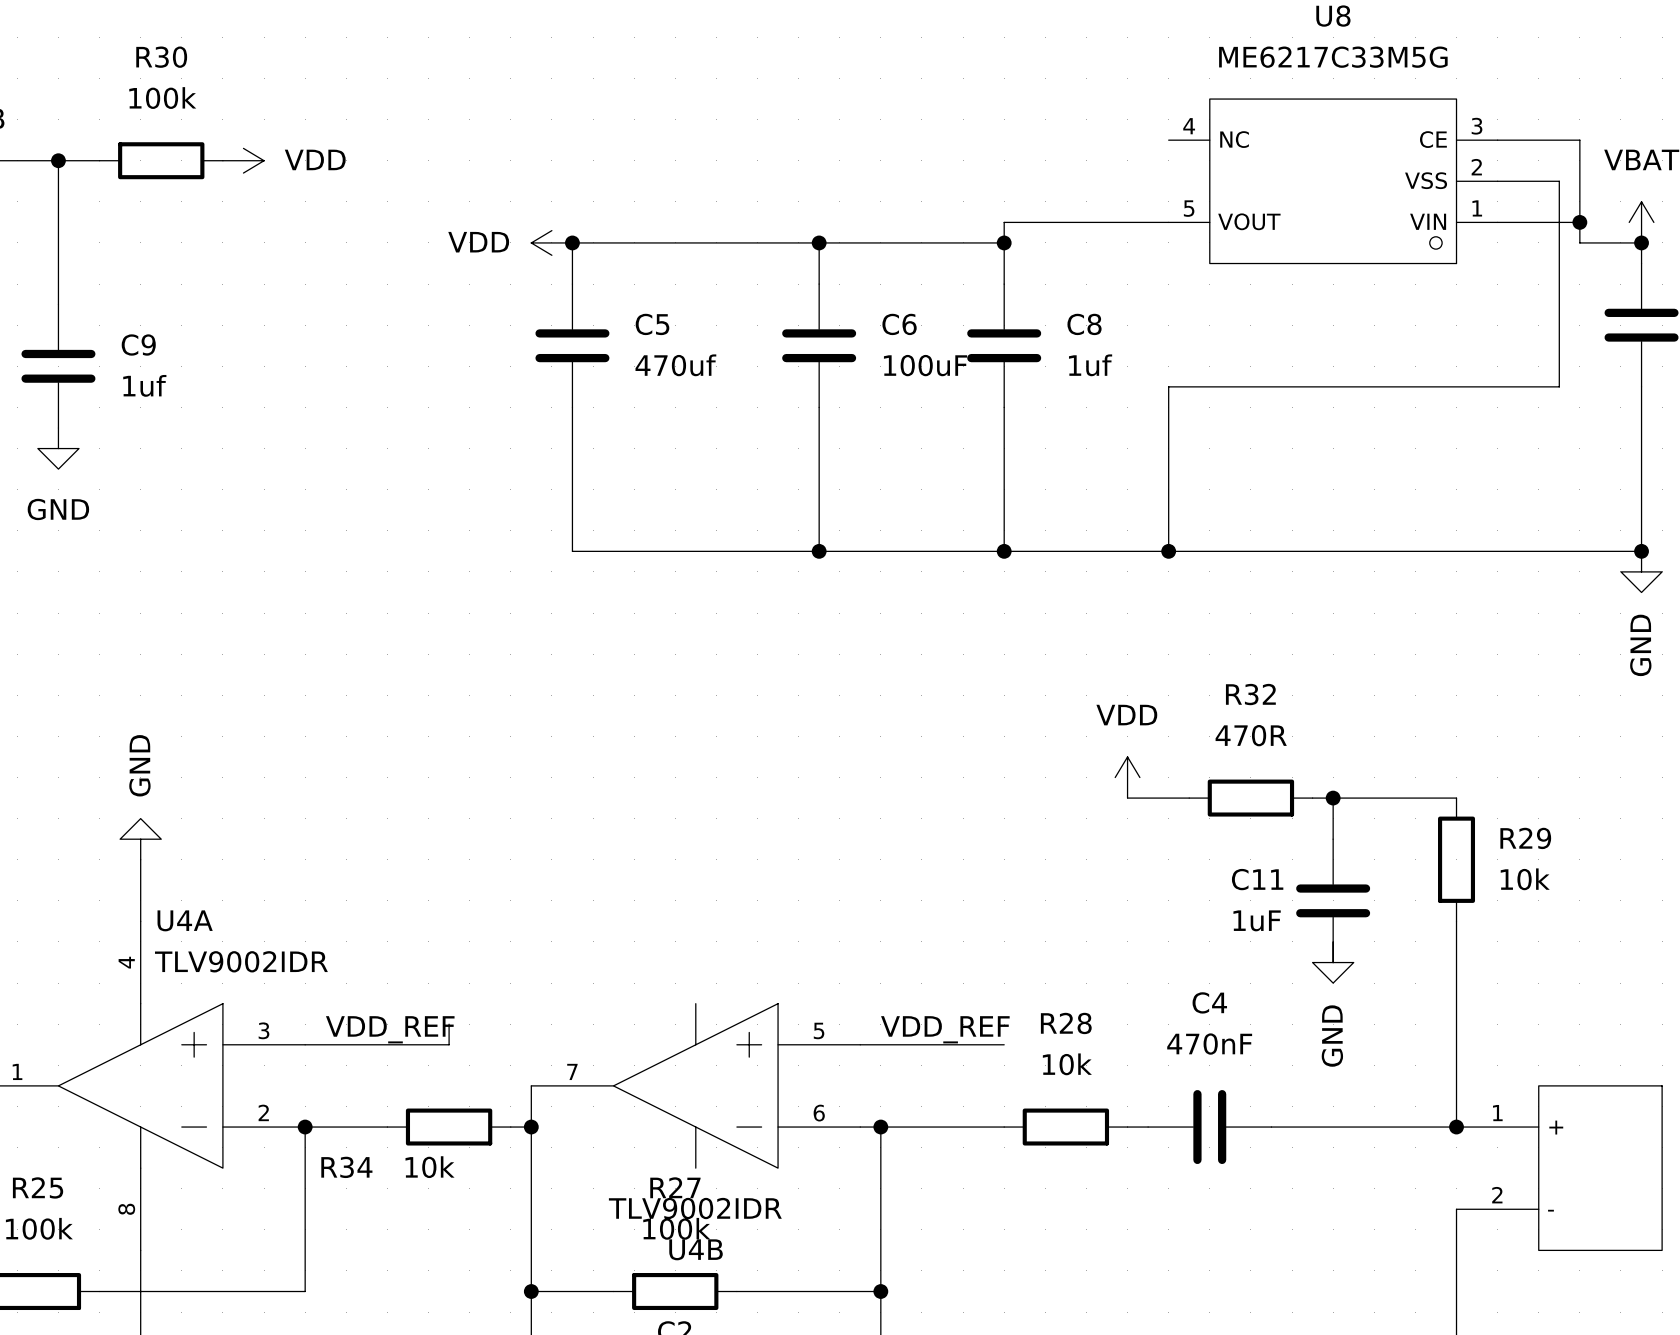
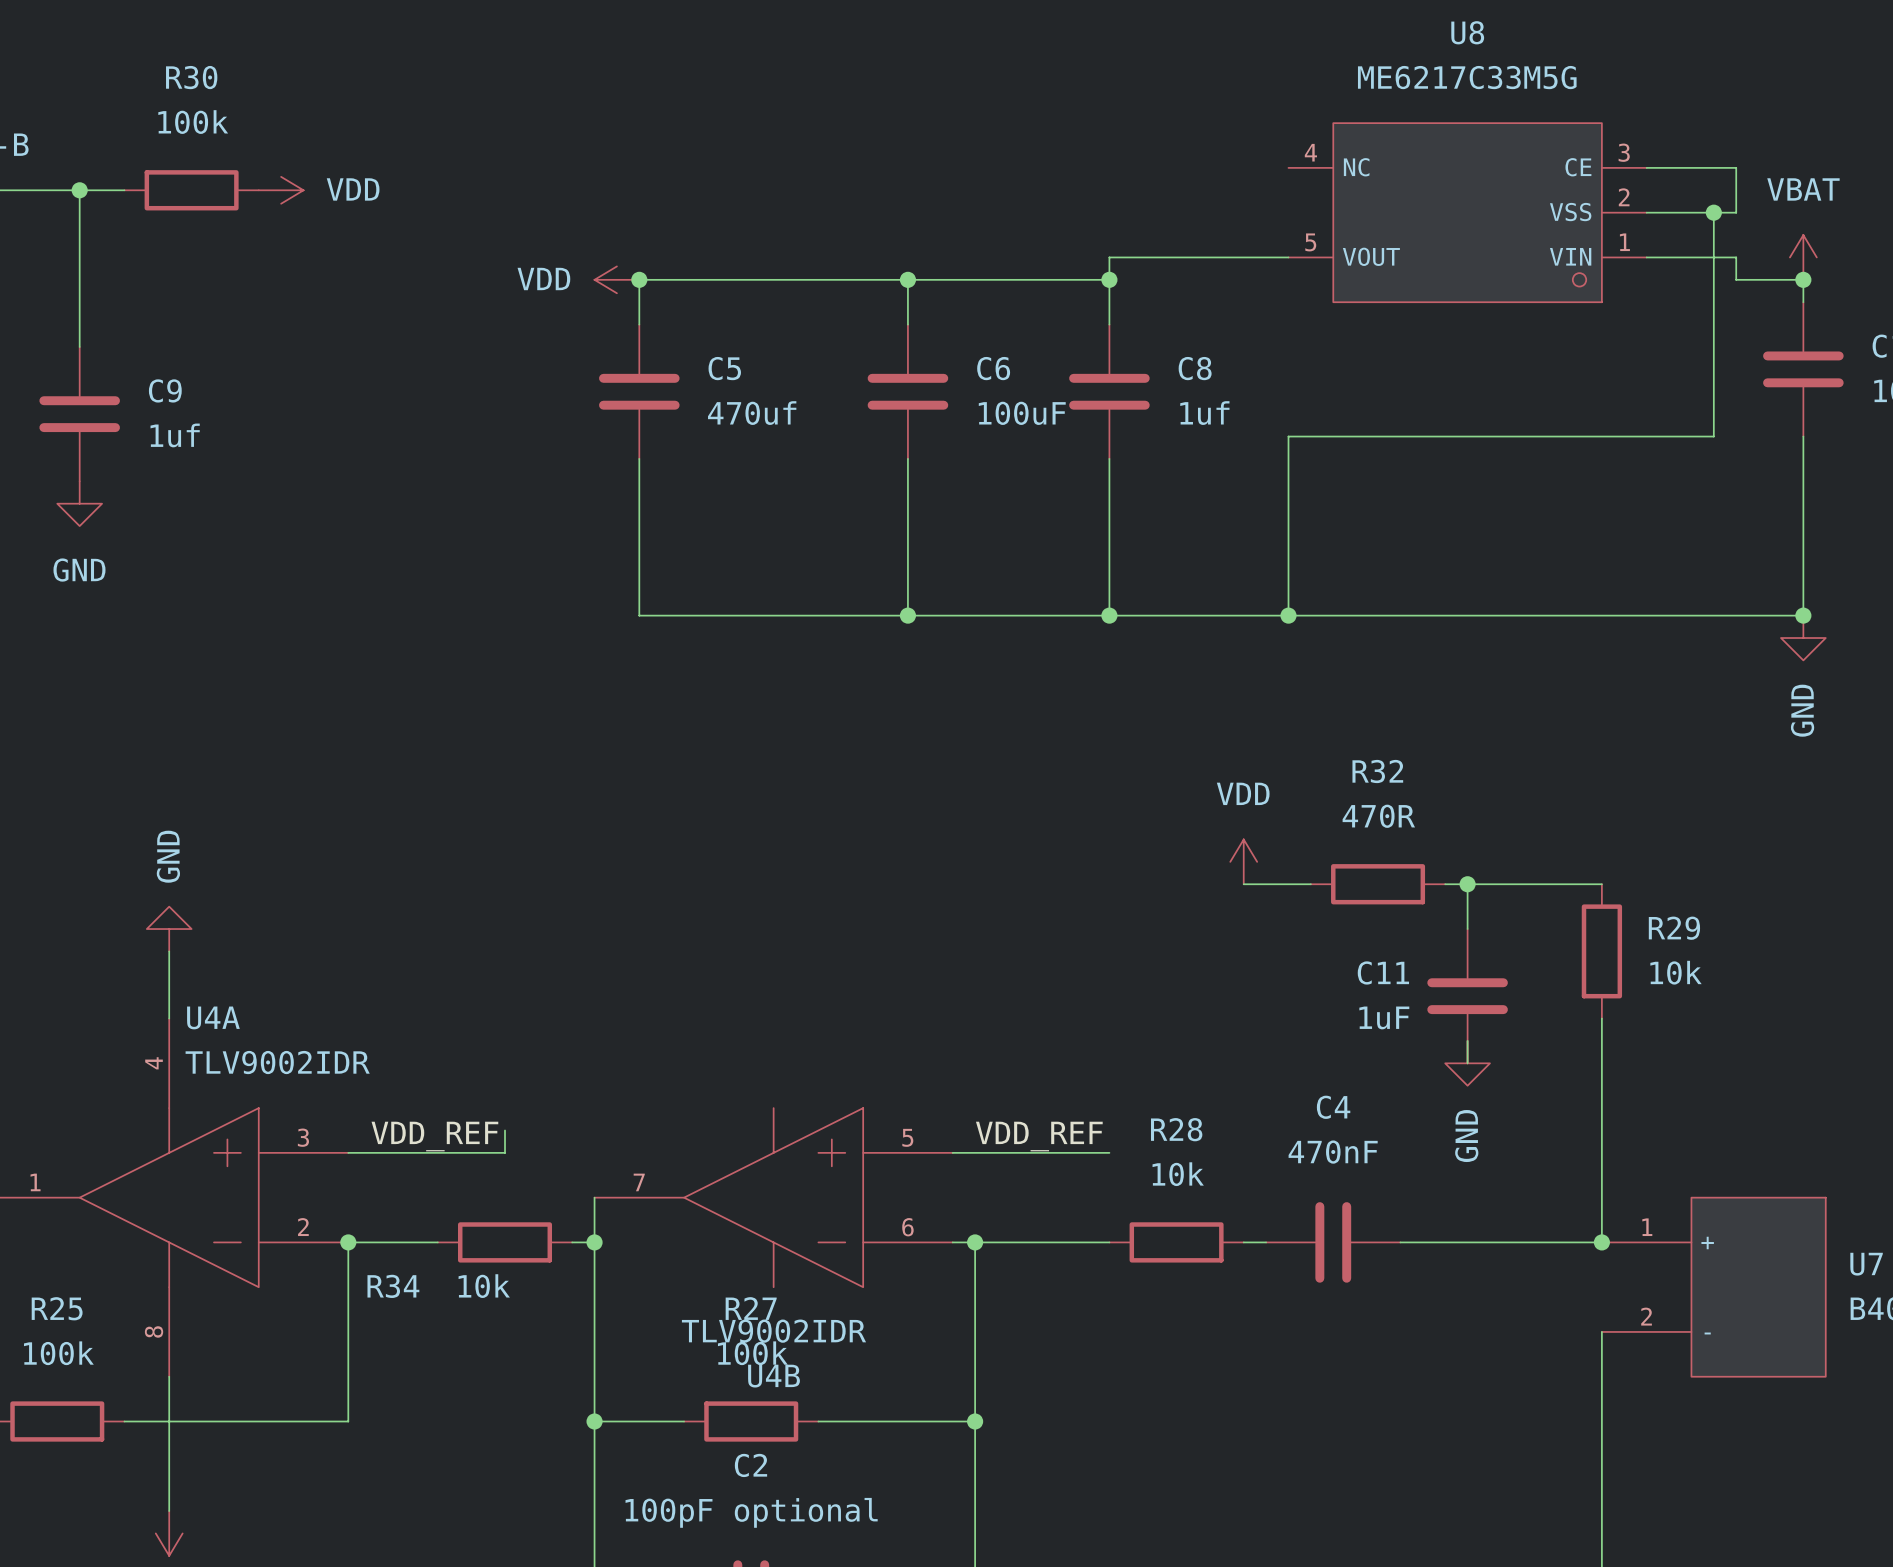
wire: (1579, 181) (1579, 222) -> (1736, 212) (1713, 212)
junction position: (1579, 222) -> (1713, 212)

